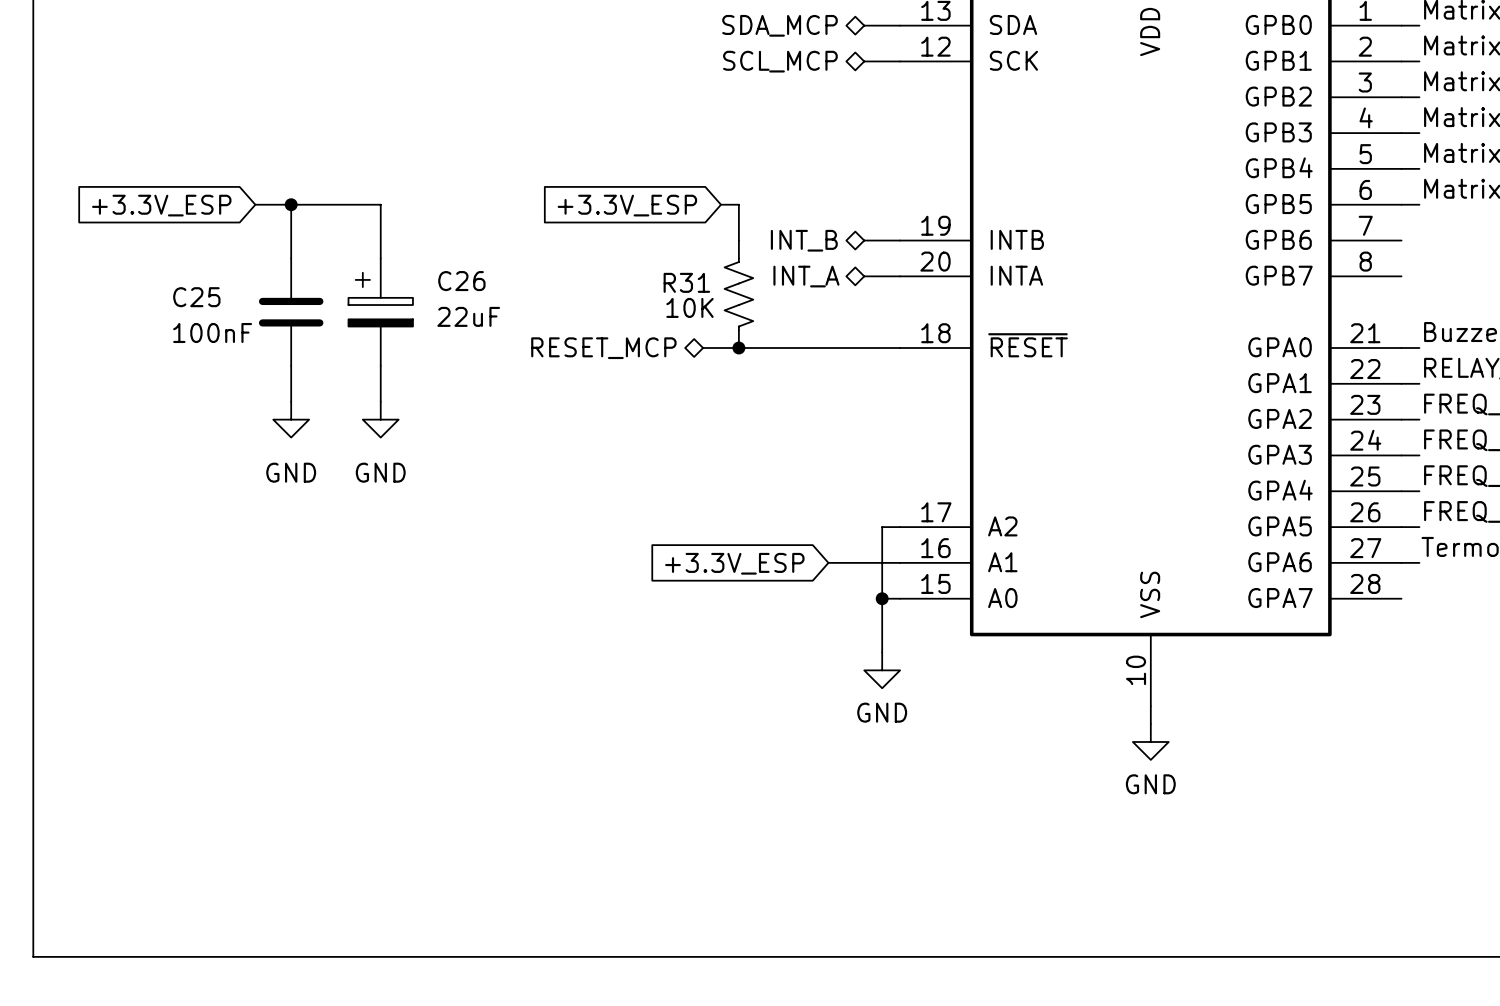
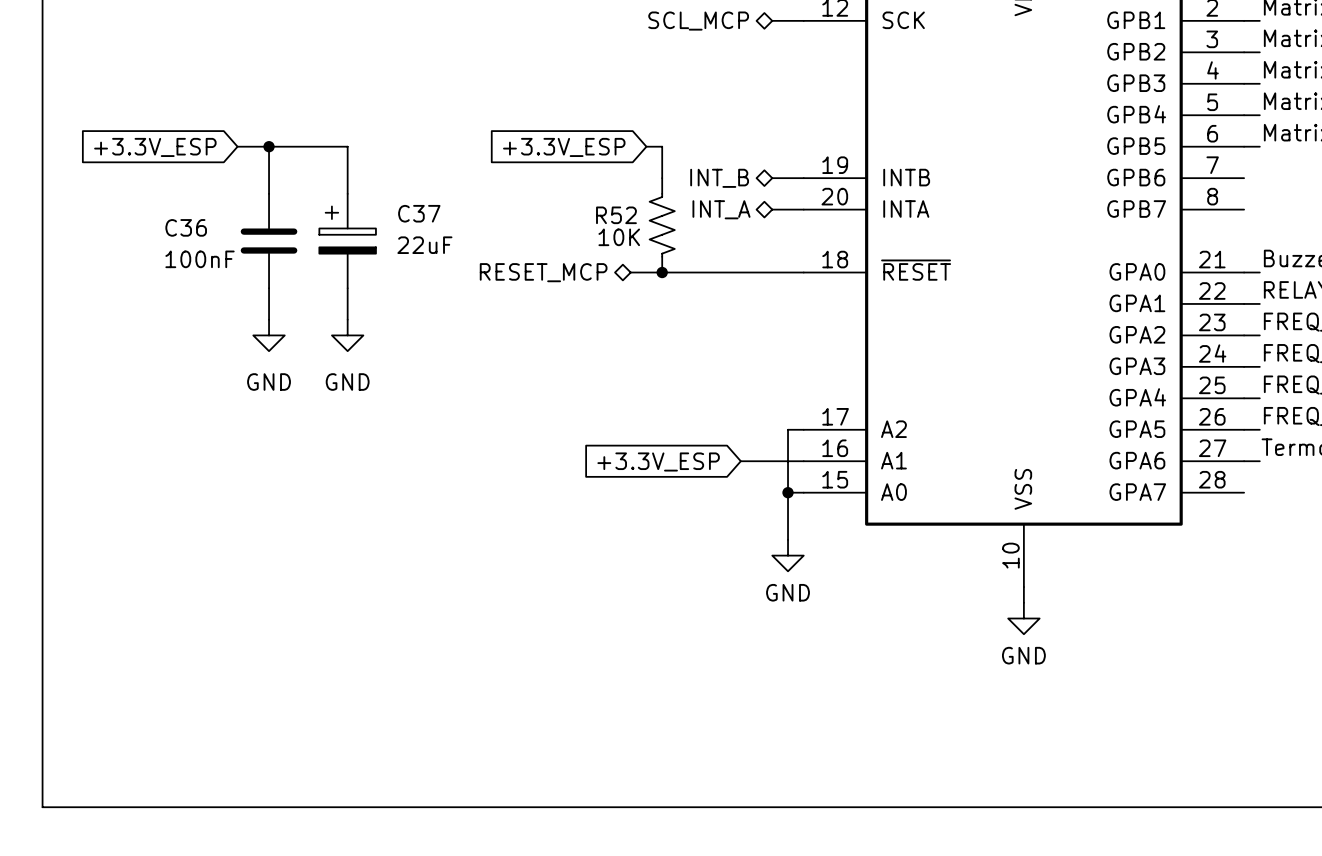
C26 name: C26 (461, 281) -> C37 (419, 213)
R31 name: R31 (686, 282) -> R52 (616, 215)
C25 name: C25 (196, 297) -> C36 (186, 227)

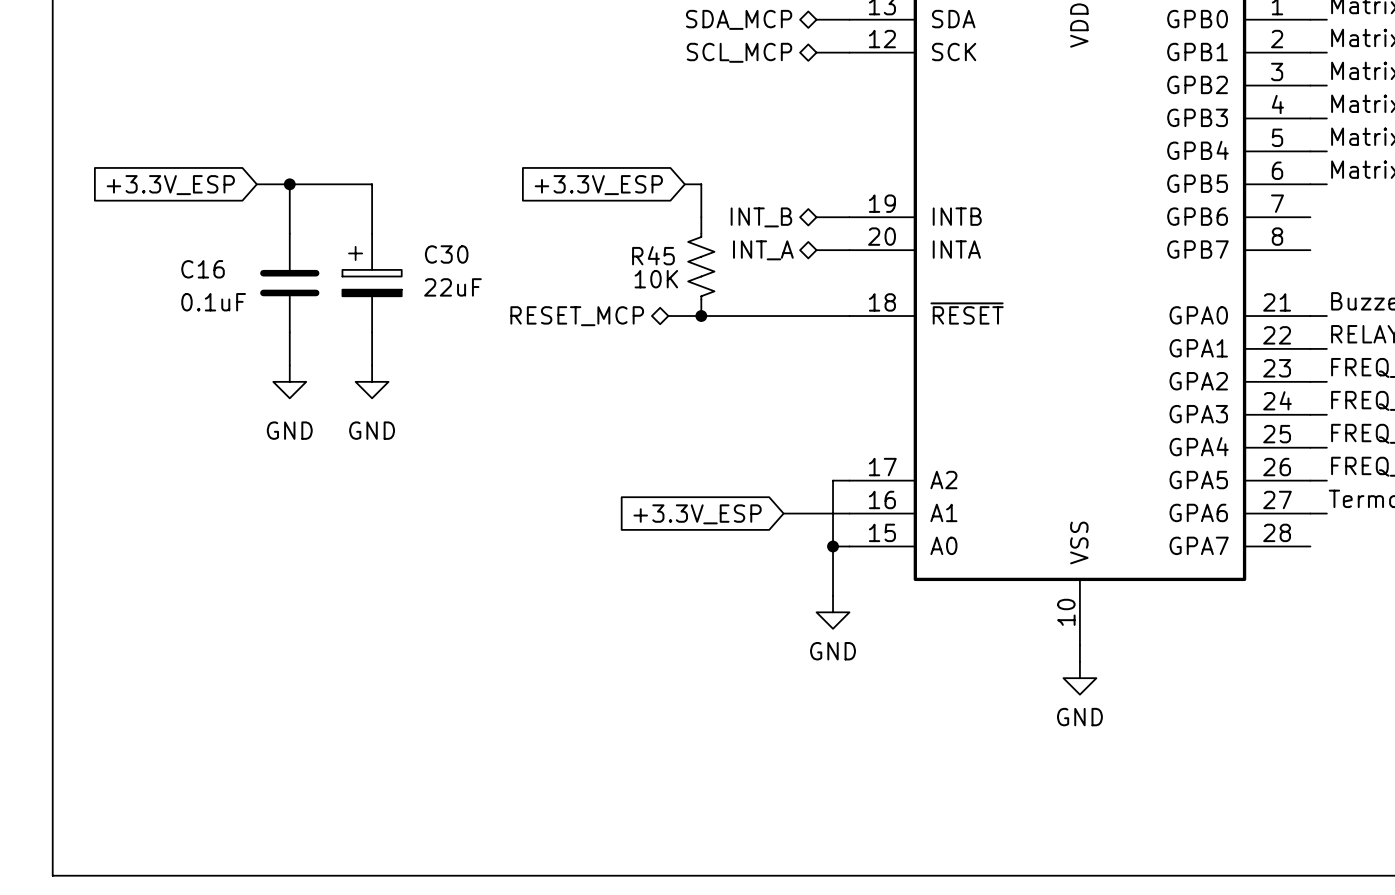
C37 name: C37 (419, 213) -> C30 (446, 254)
R52 name: R52 (616, 215) -> R45 (653, 255)
C36 name: C36 (186, 227) -> C16 (203, 269)
C36 value: 100nF (200, 259) -> 0.1uF (213, 302)

